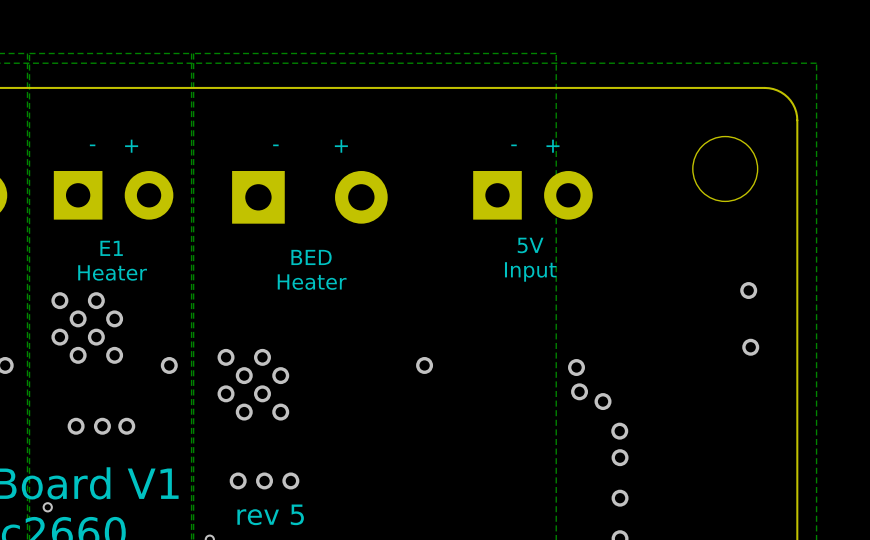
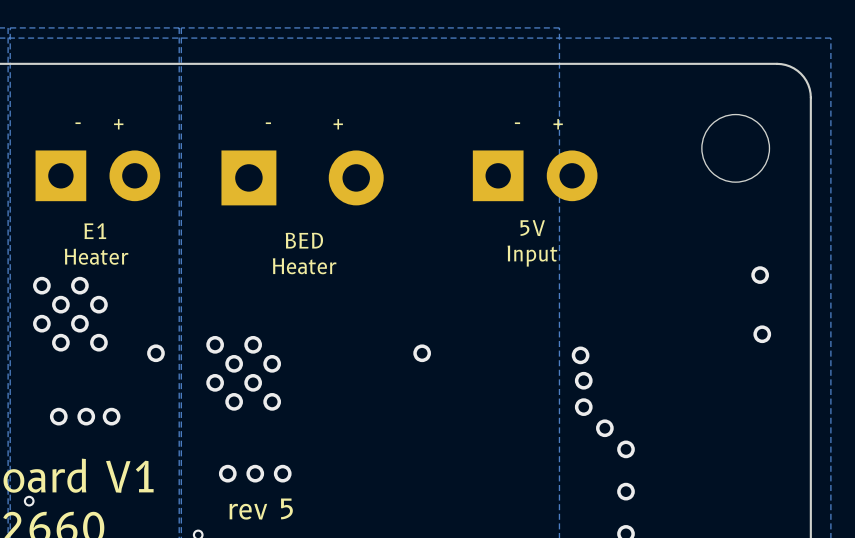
via: (603, 401) -> none
via: none -> (583, 407)
via: (619, 431) -> none
via: none -> (604, 428)

